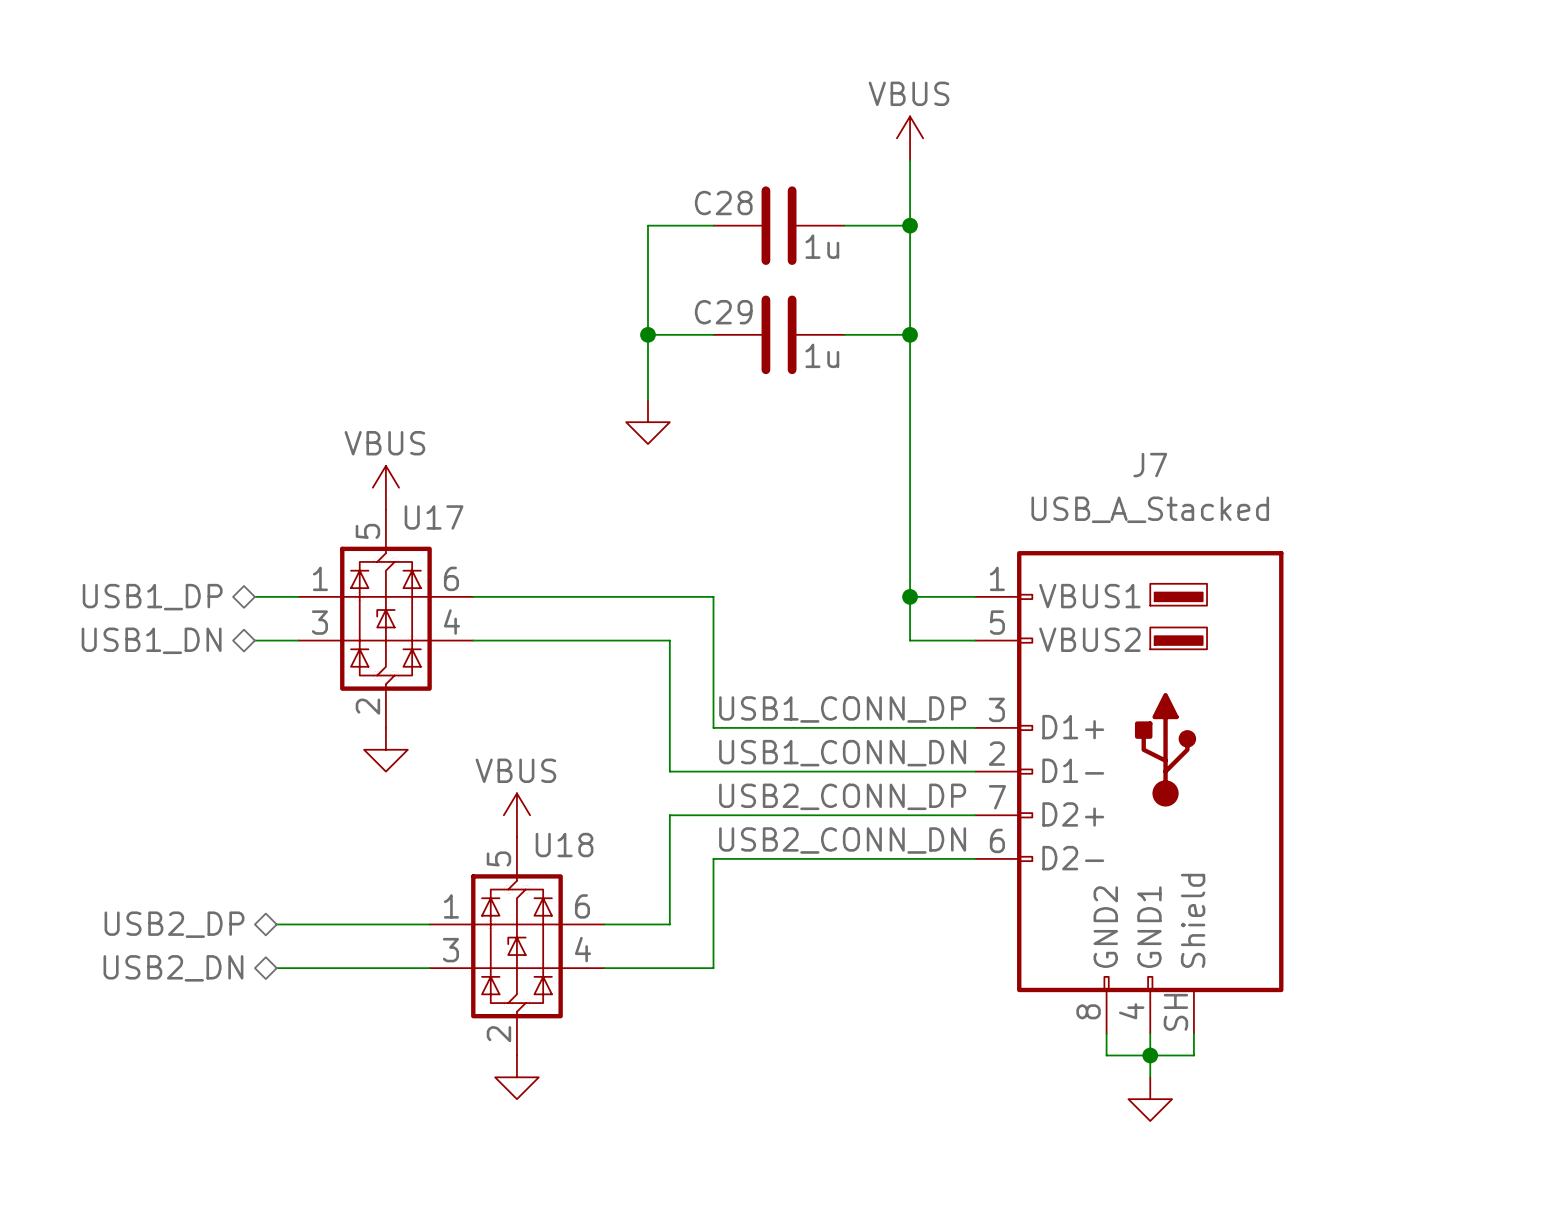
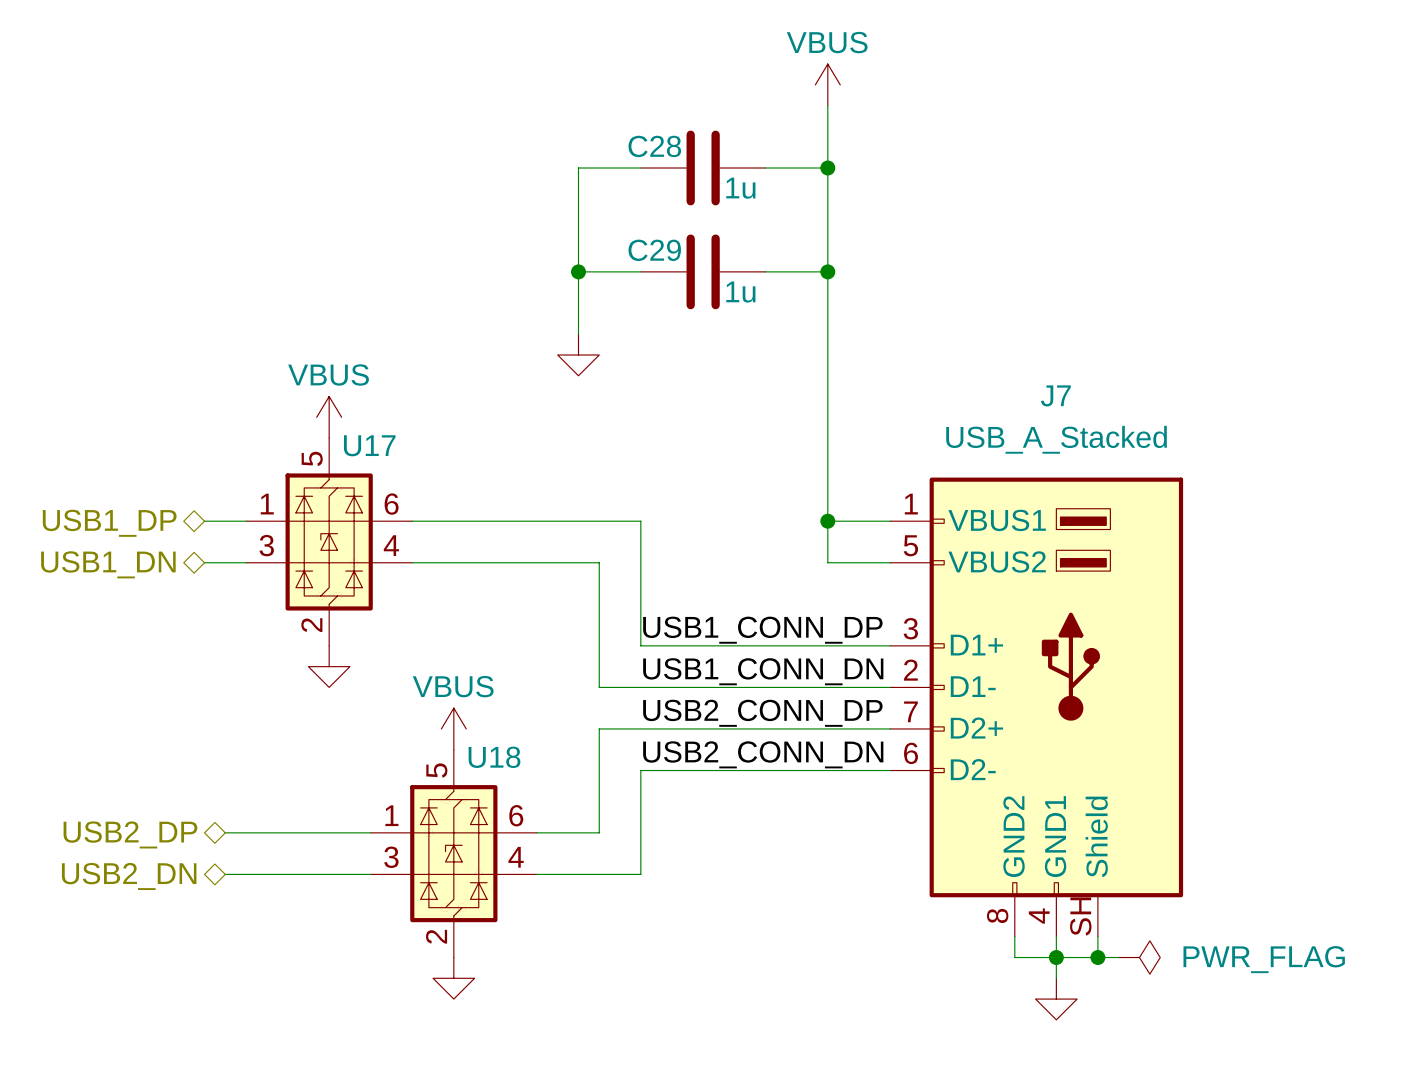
wire: none -> (1097, 957) (1118, 957)
junction: none -> (1097, 957)
power symbol: none -> PWR_FLAG (1139, 957)

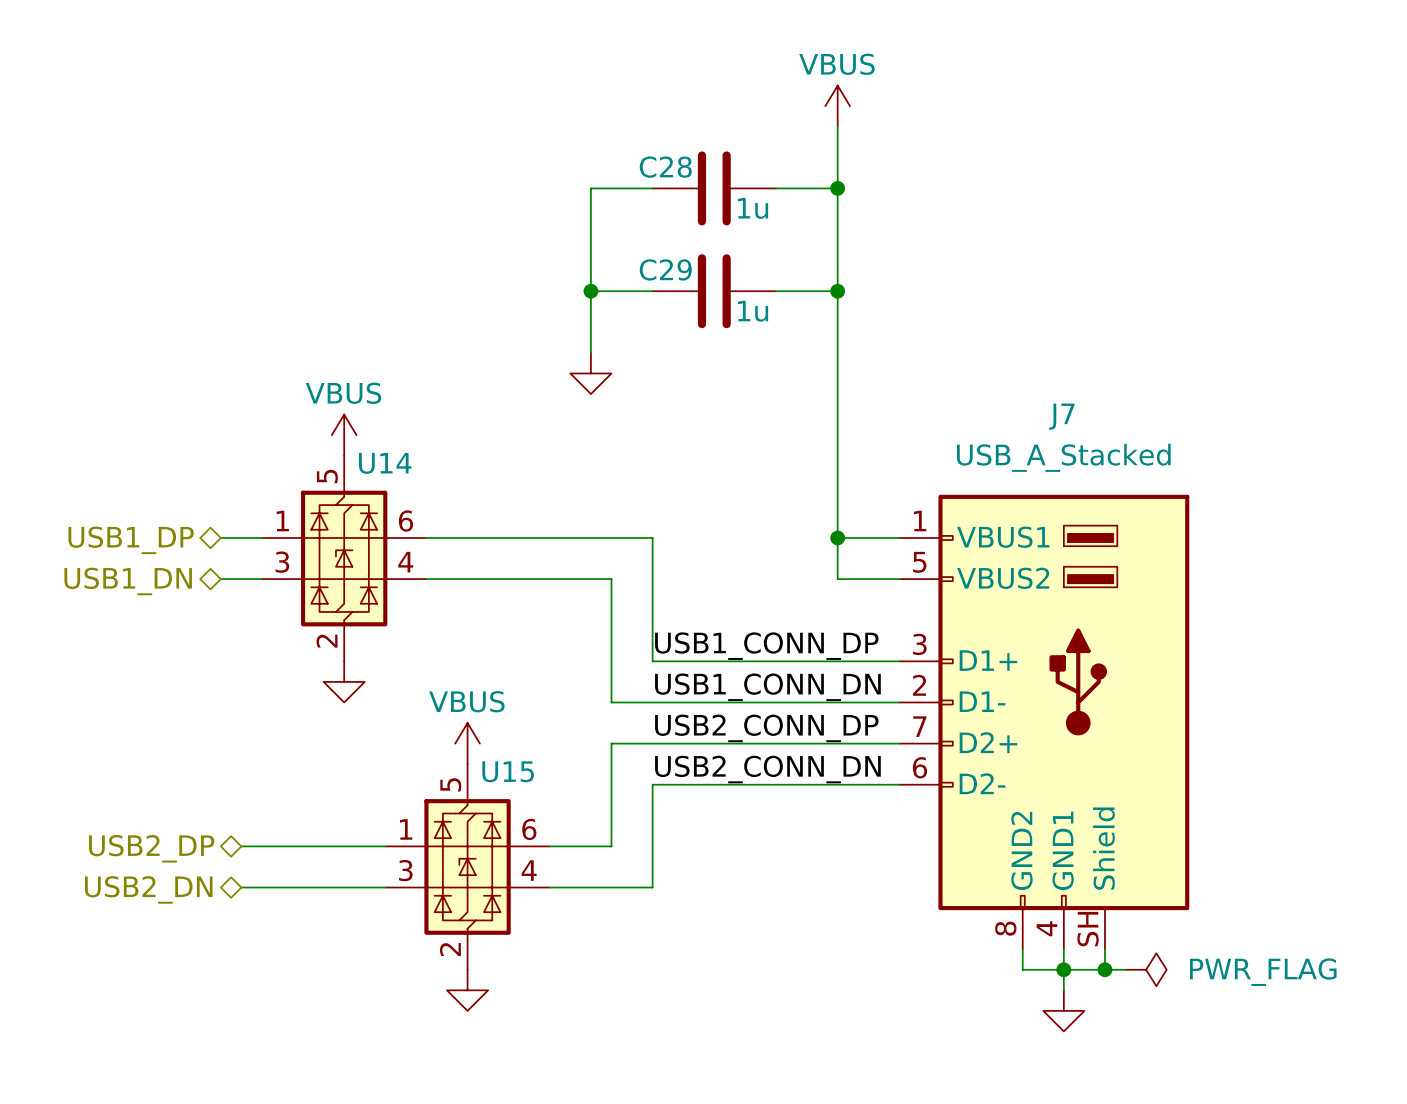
U17 name: U17 (369, 445) -> U14 (385, 463)
U18 name: U18 (494, 757) -> U15 (508, 771)

